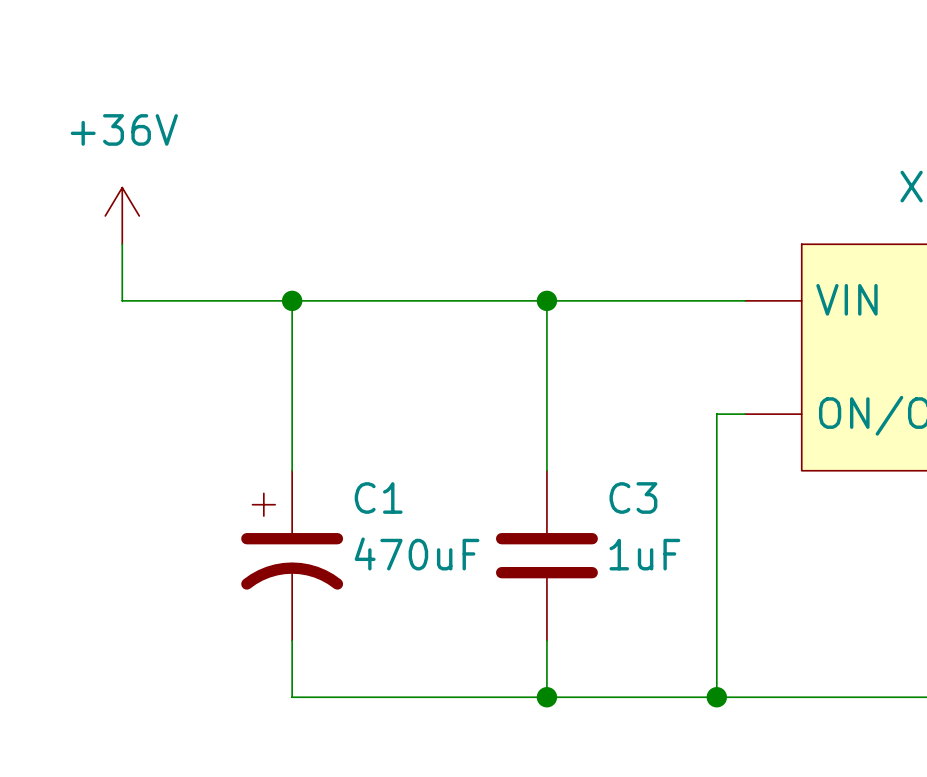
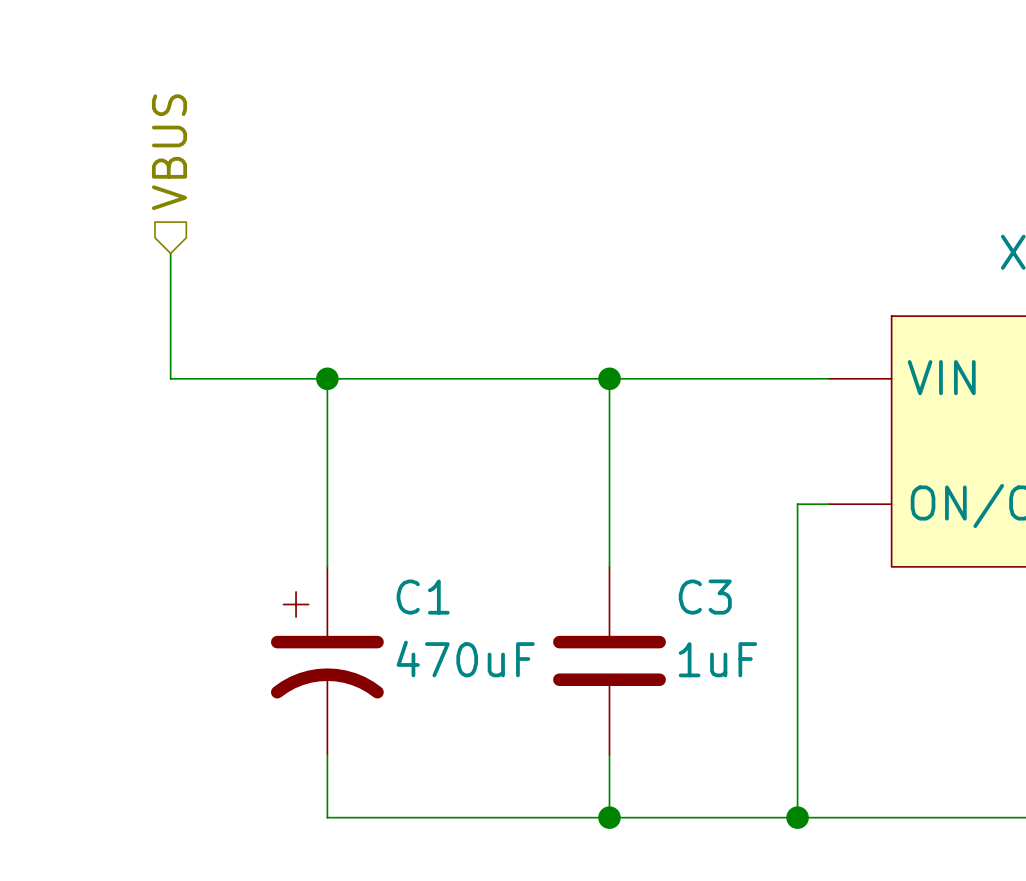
hierarchical label: none -> VBUS (169, 152)
power symbol: +36V (122, 215) -> none
wire: (122, 244) (122, 300) (150, 300) -> (170, 253) (170, 378)

